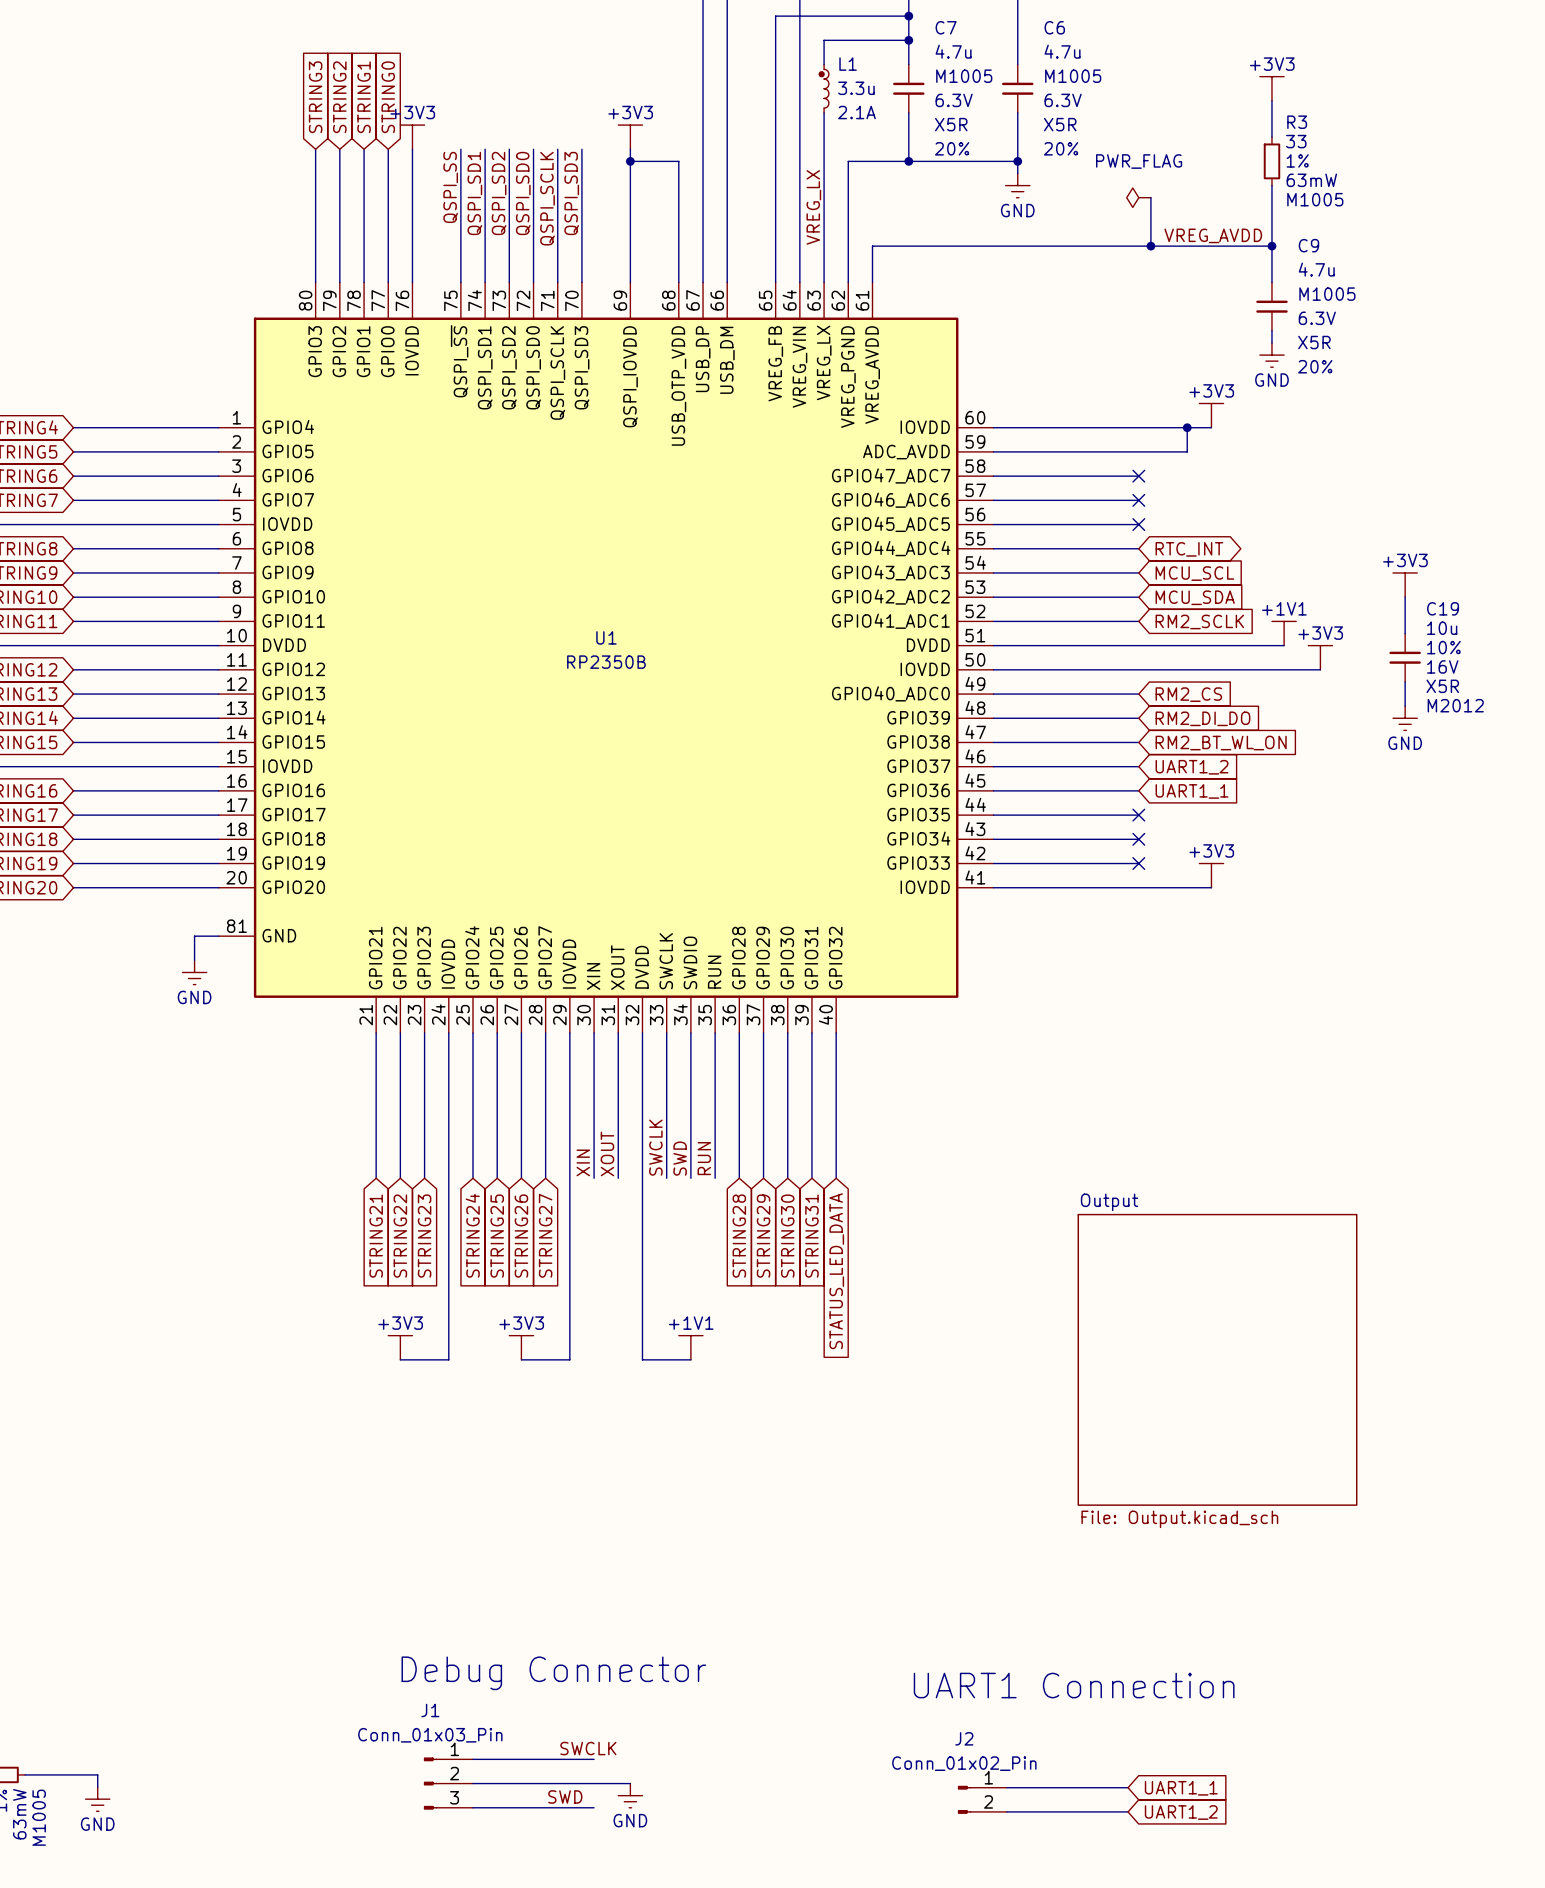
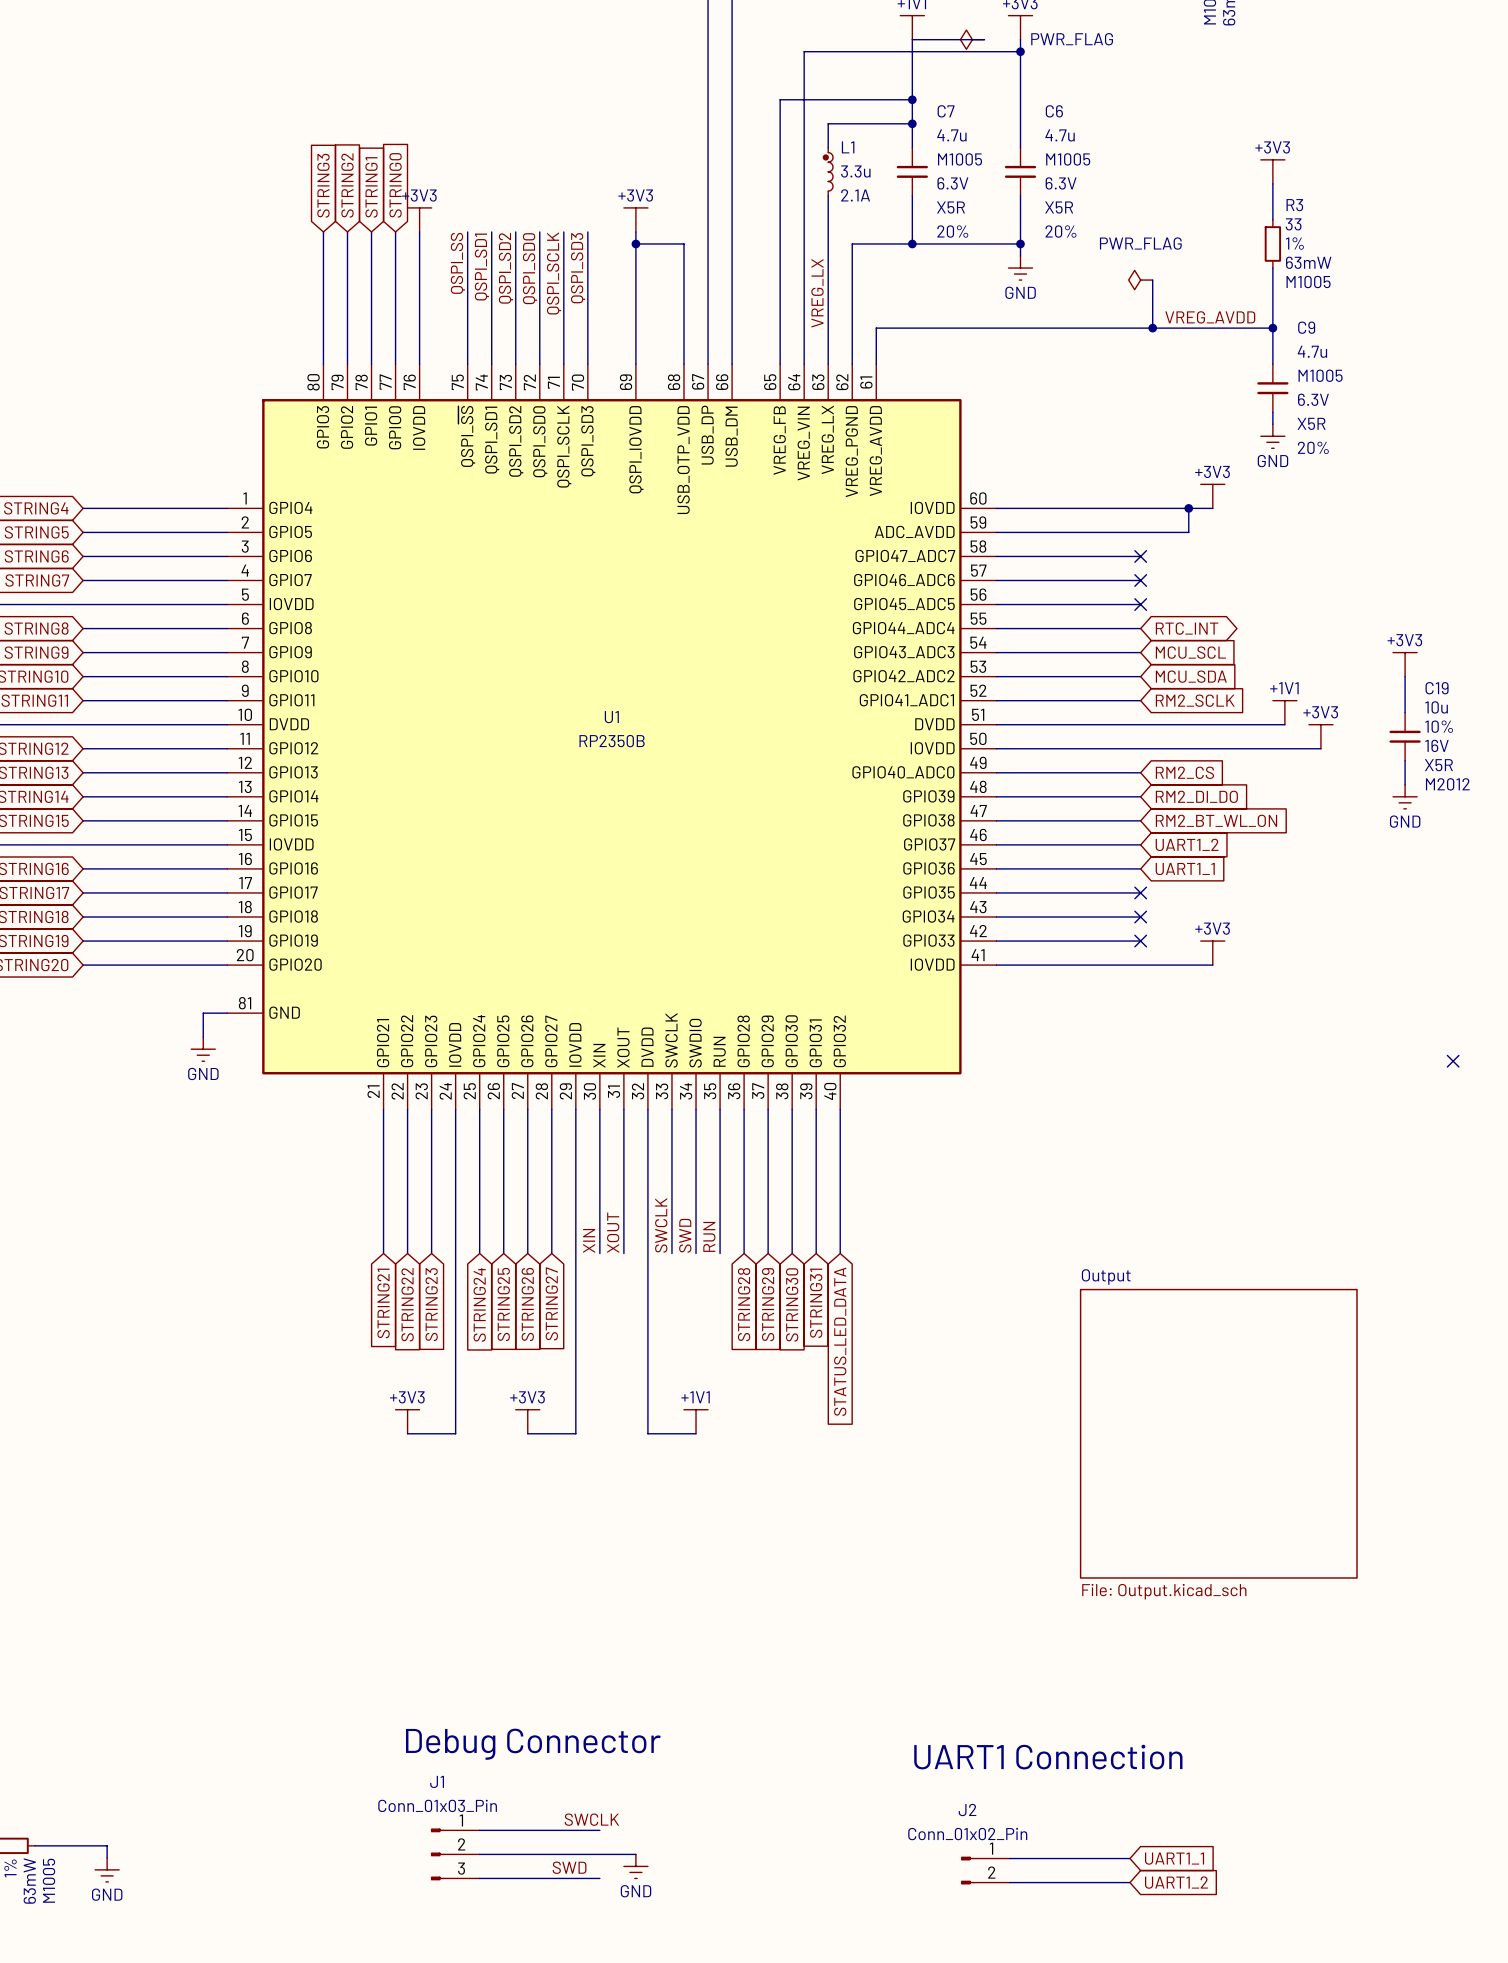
no-connect mark: none -> (1453, 1061)

